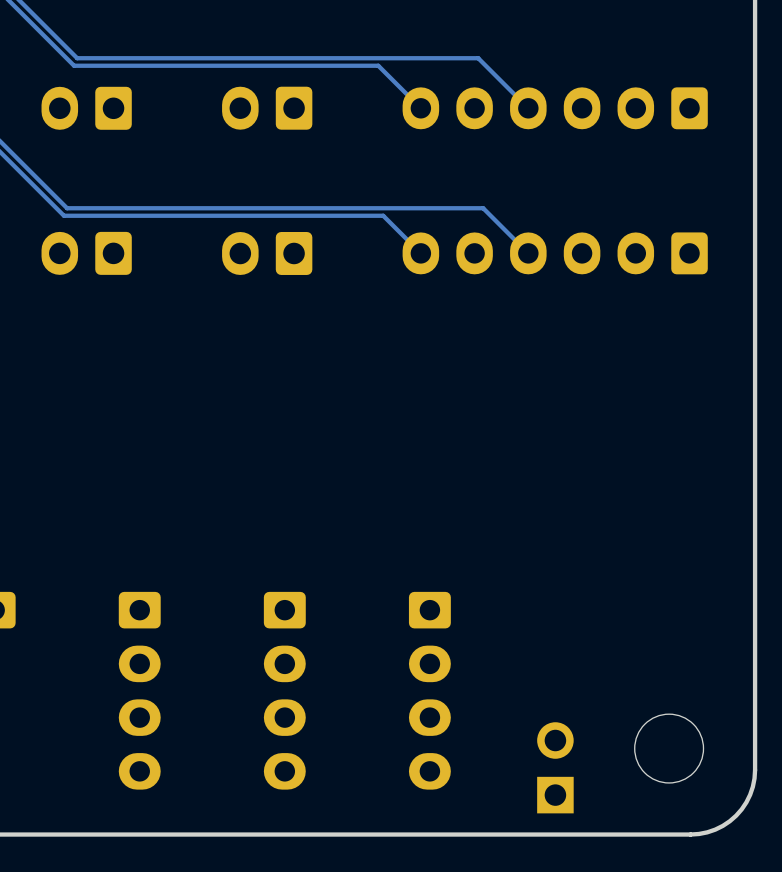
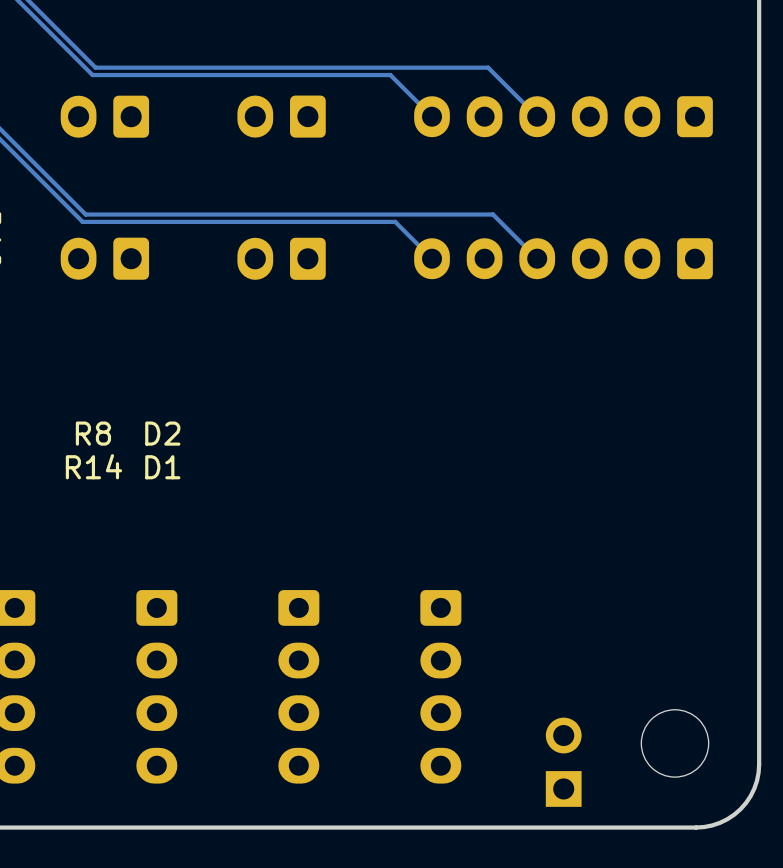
R8: none -> (93, 433)
D2: none -> (162, 433)
R14: none -> (93, 466)
D1: none -> (162, 467)

